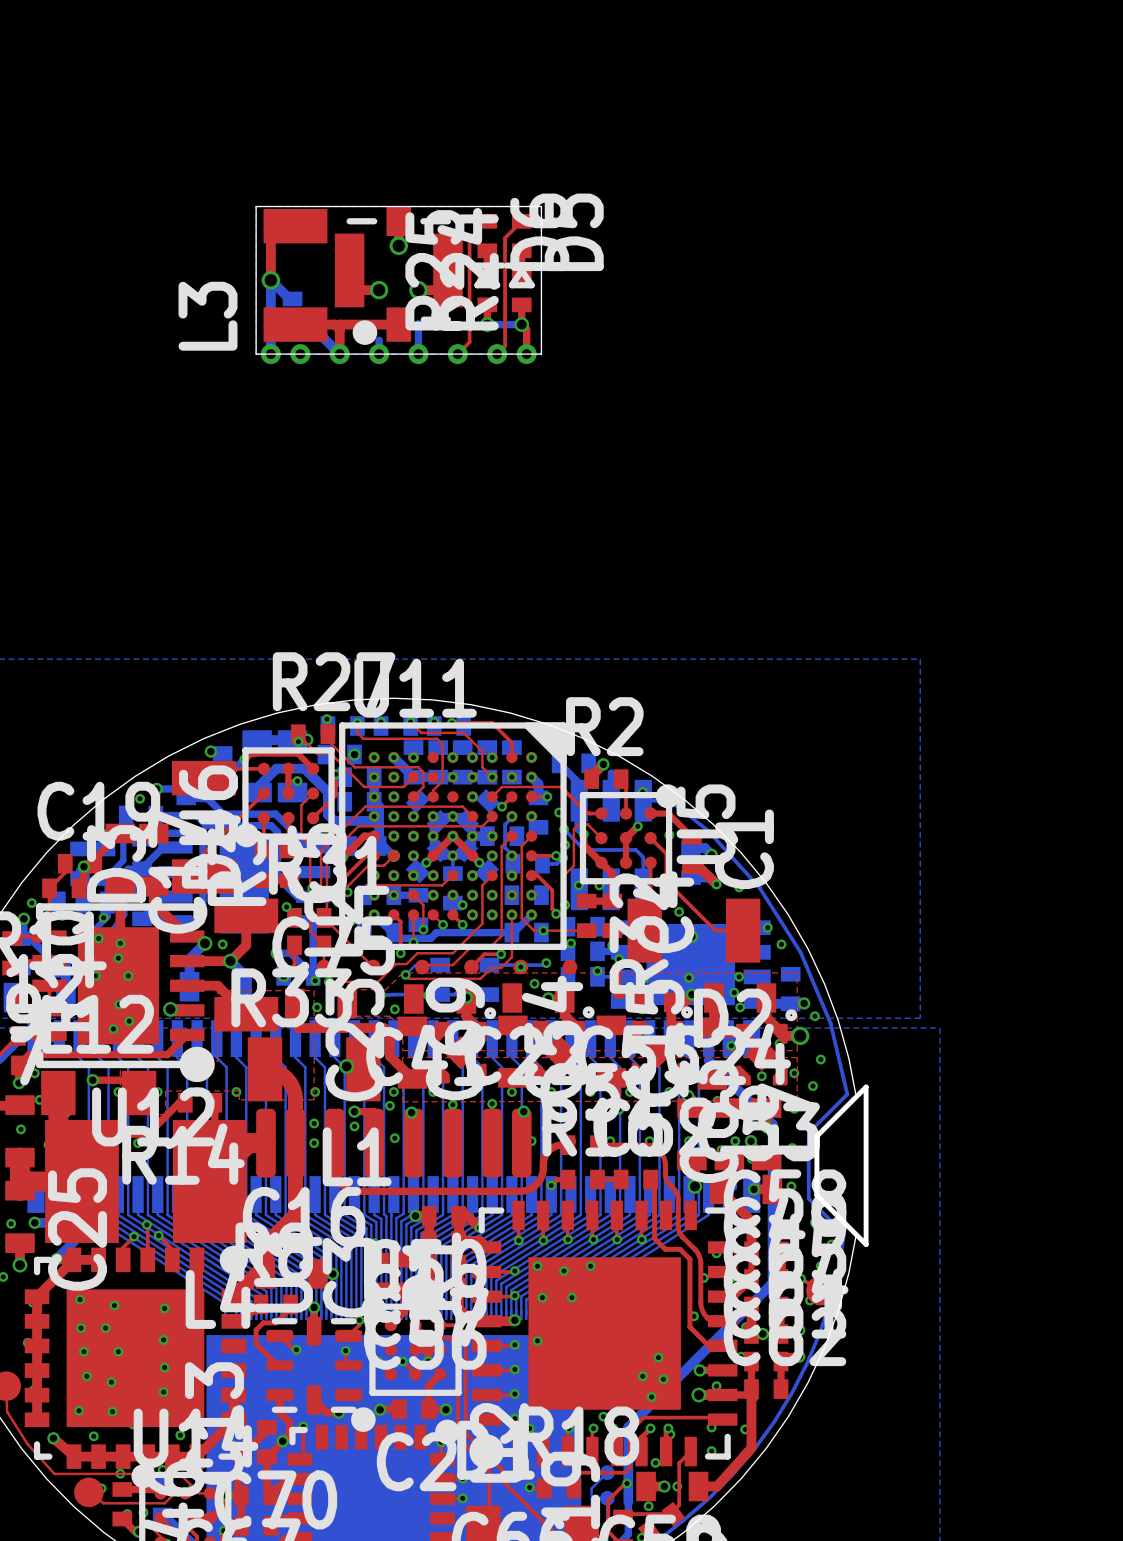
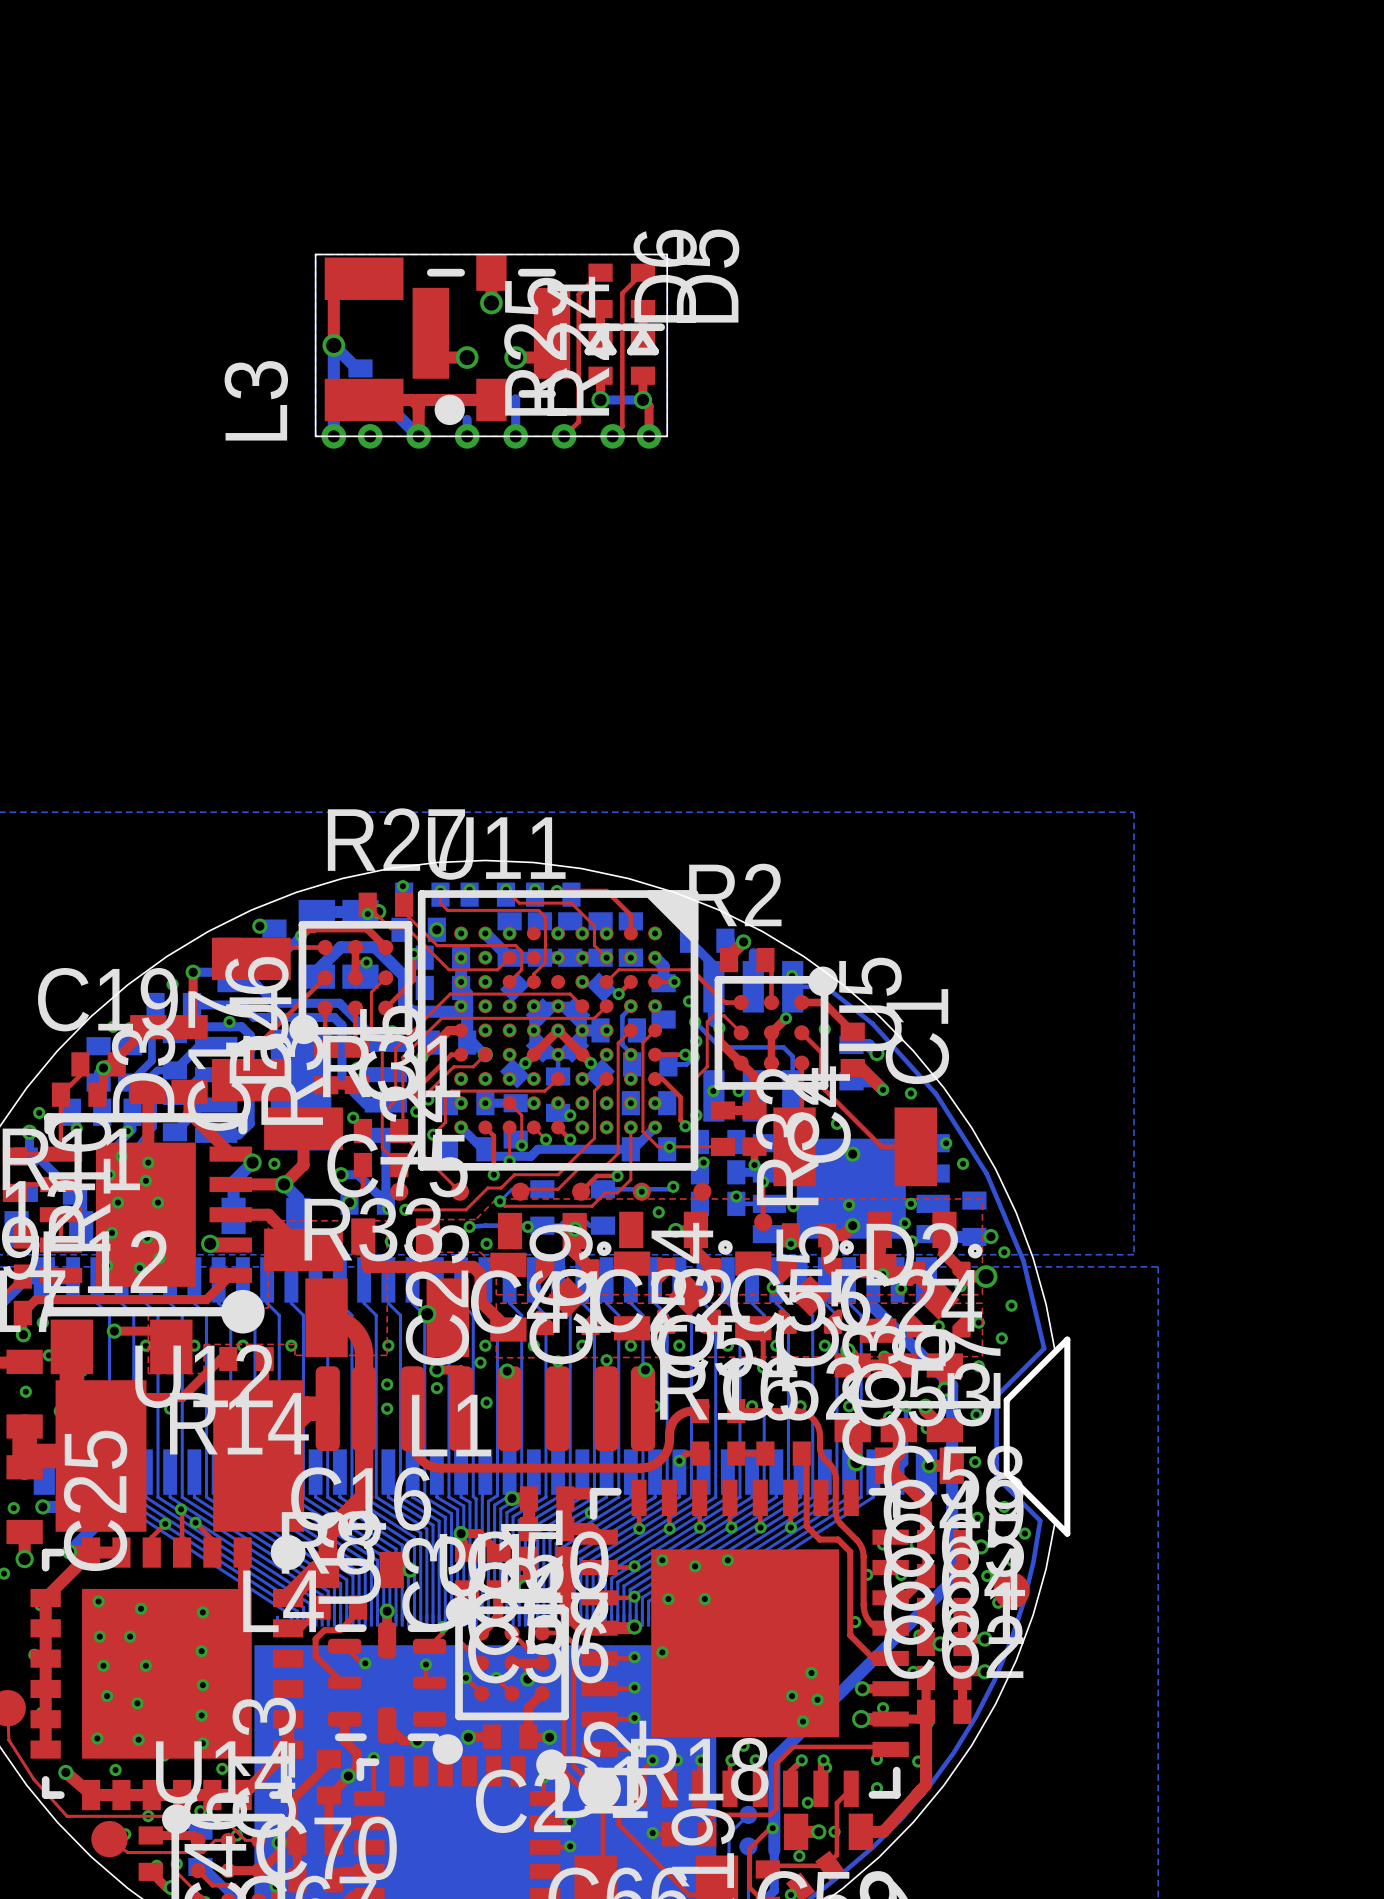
top track: (462, 1212) (479, 1227) -> (570, 1493) (590, 1493)

